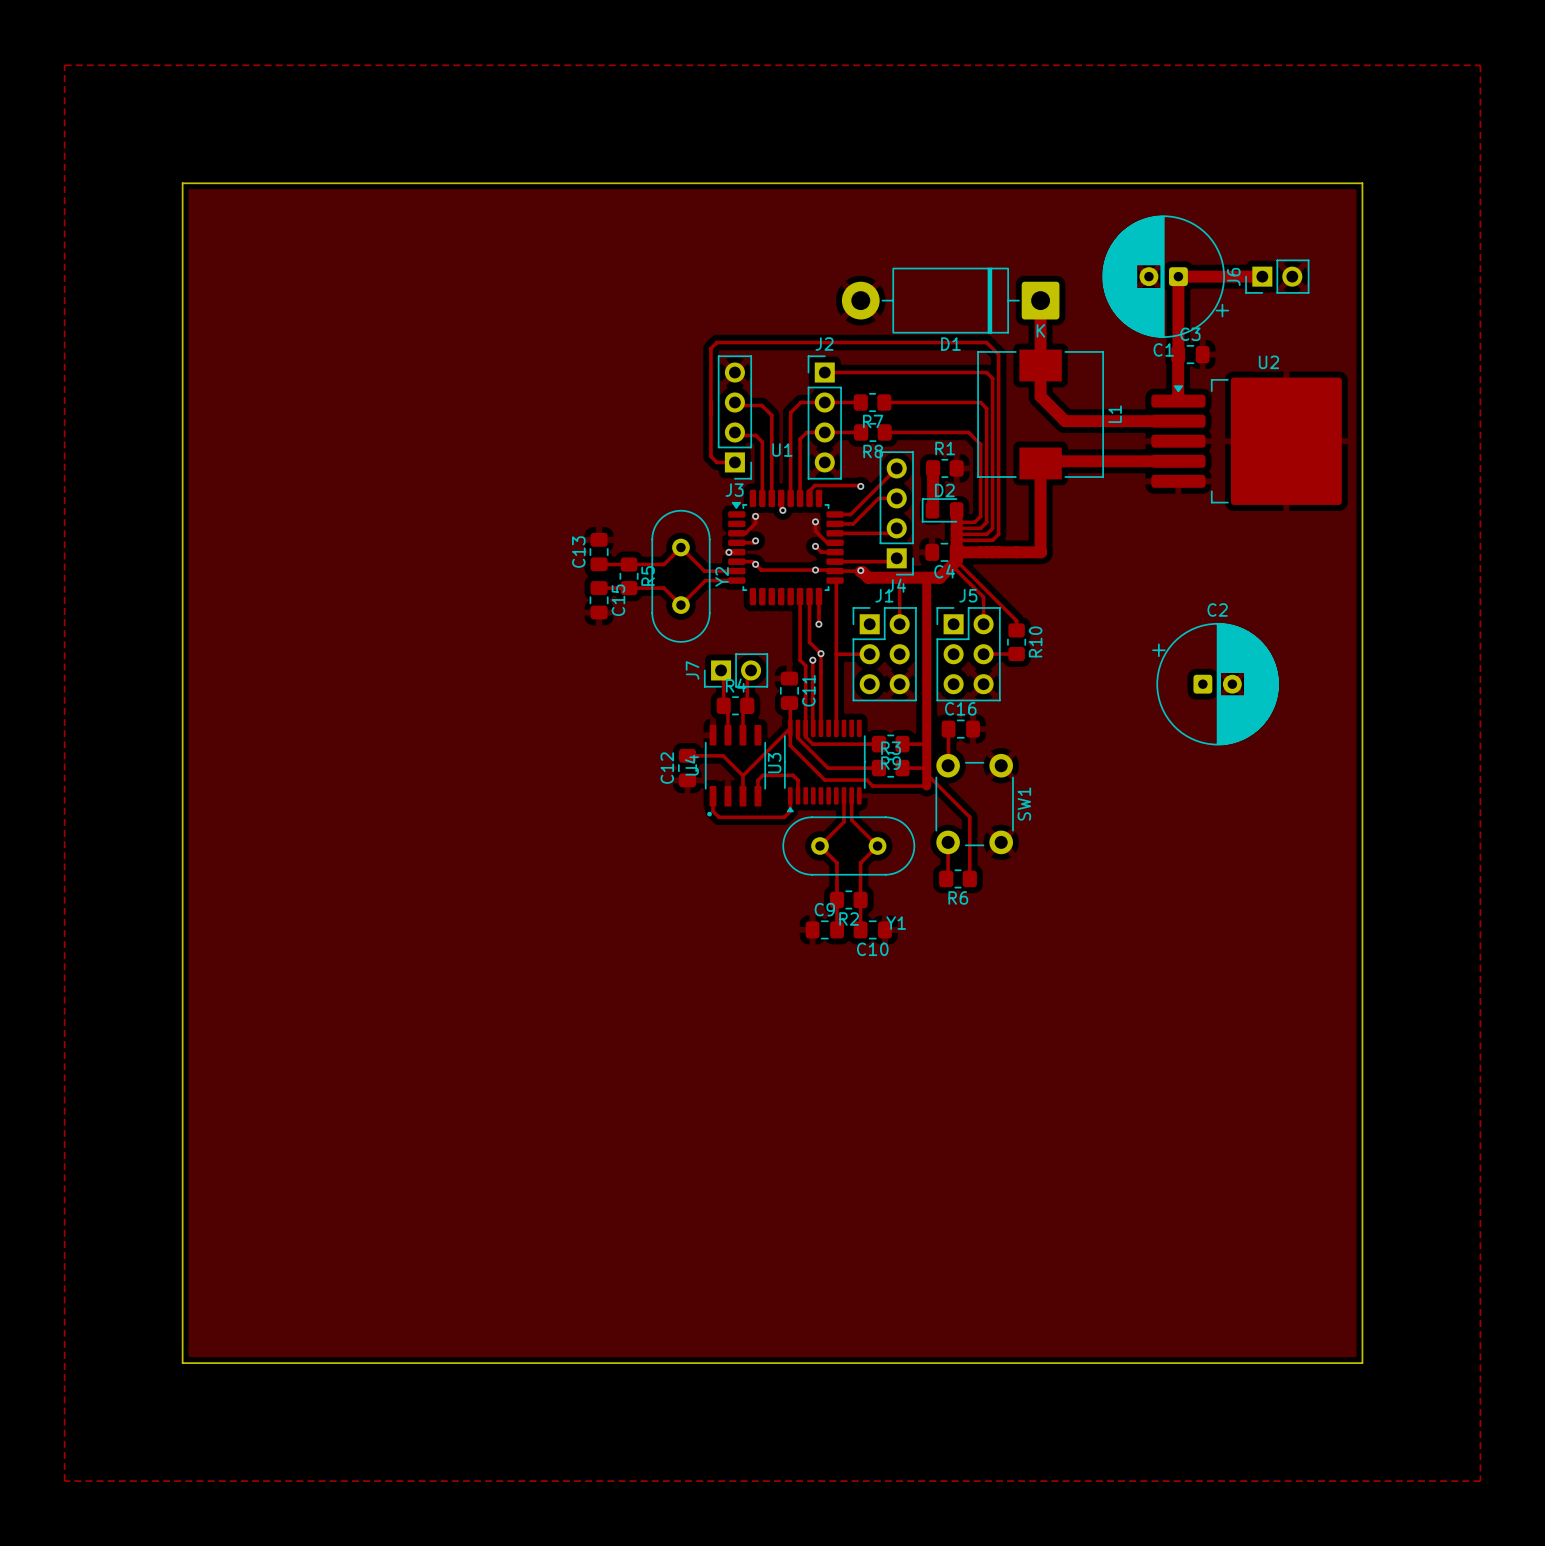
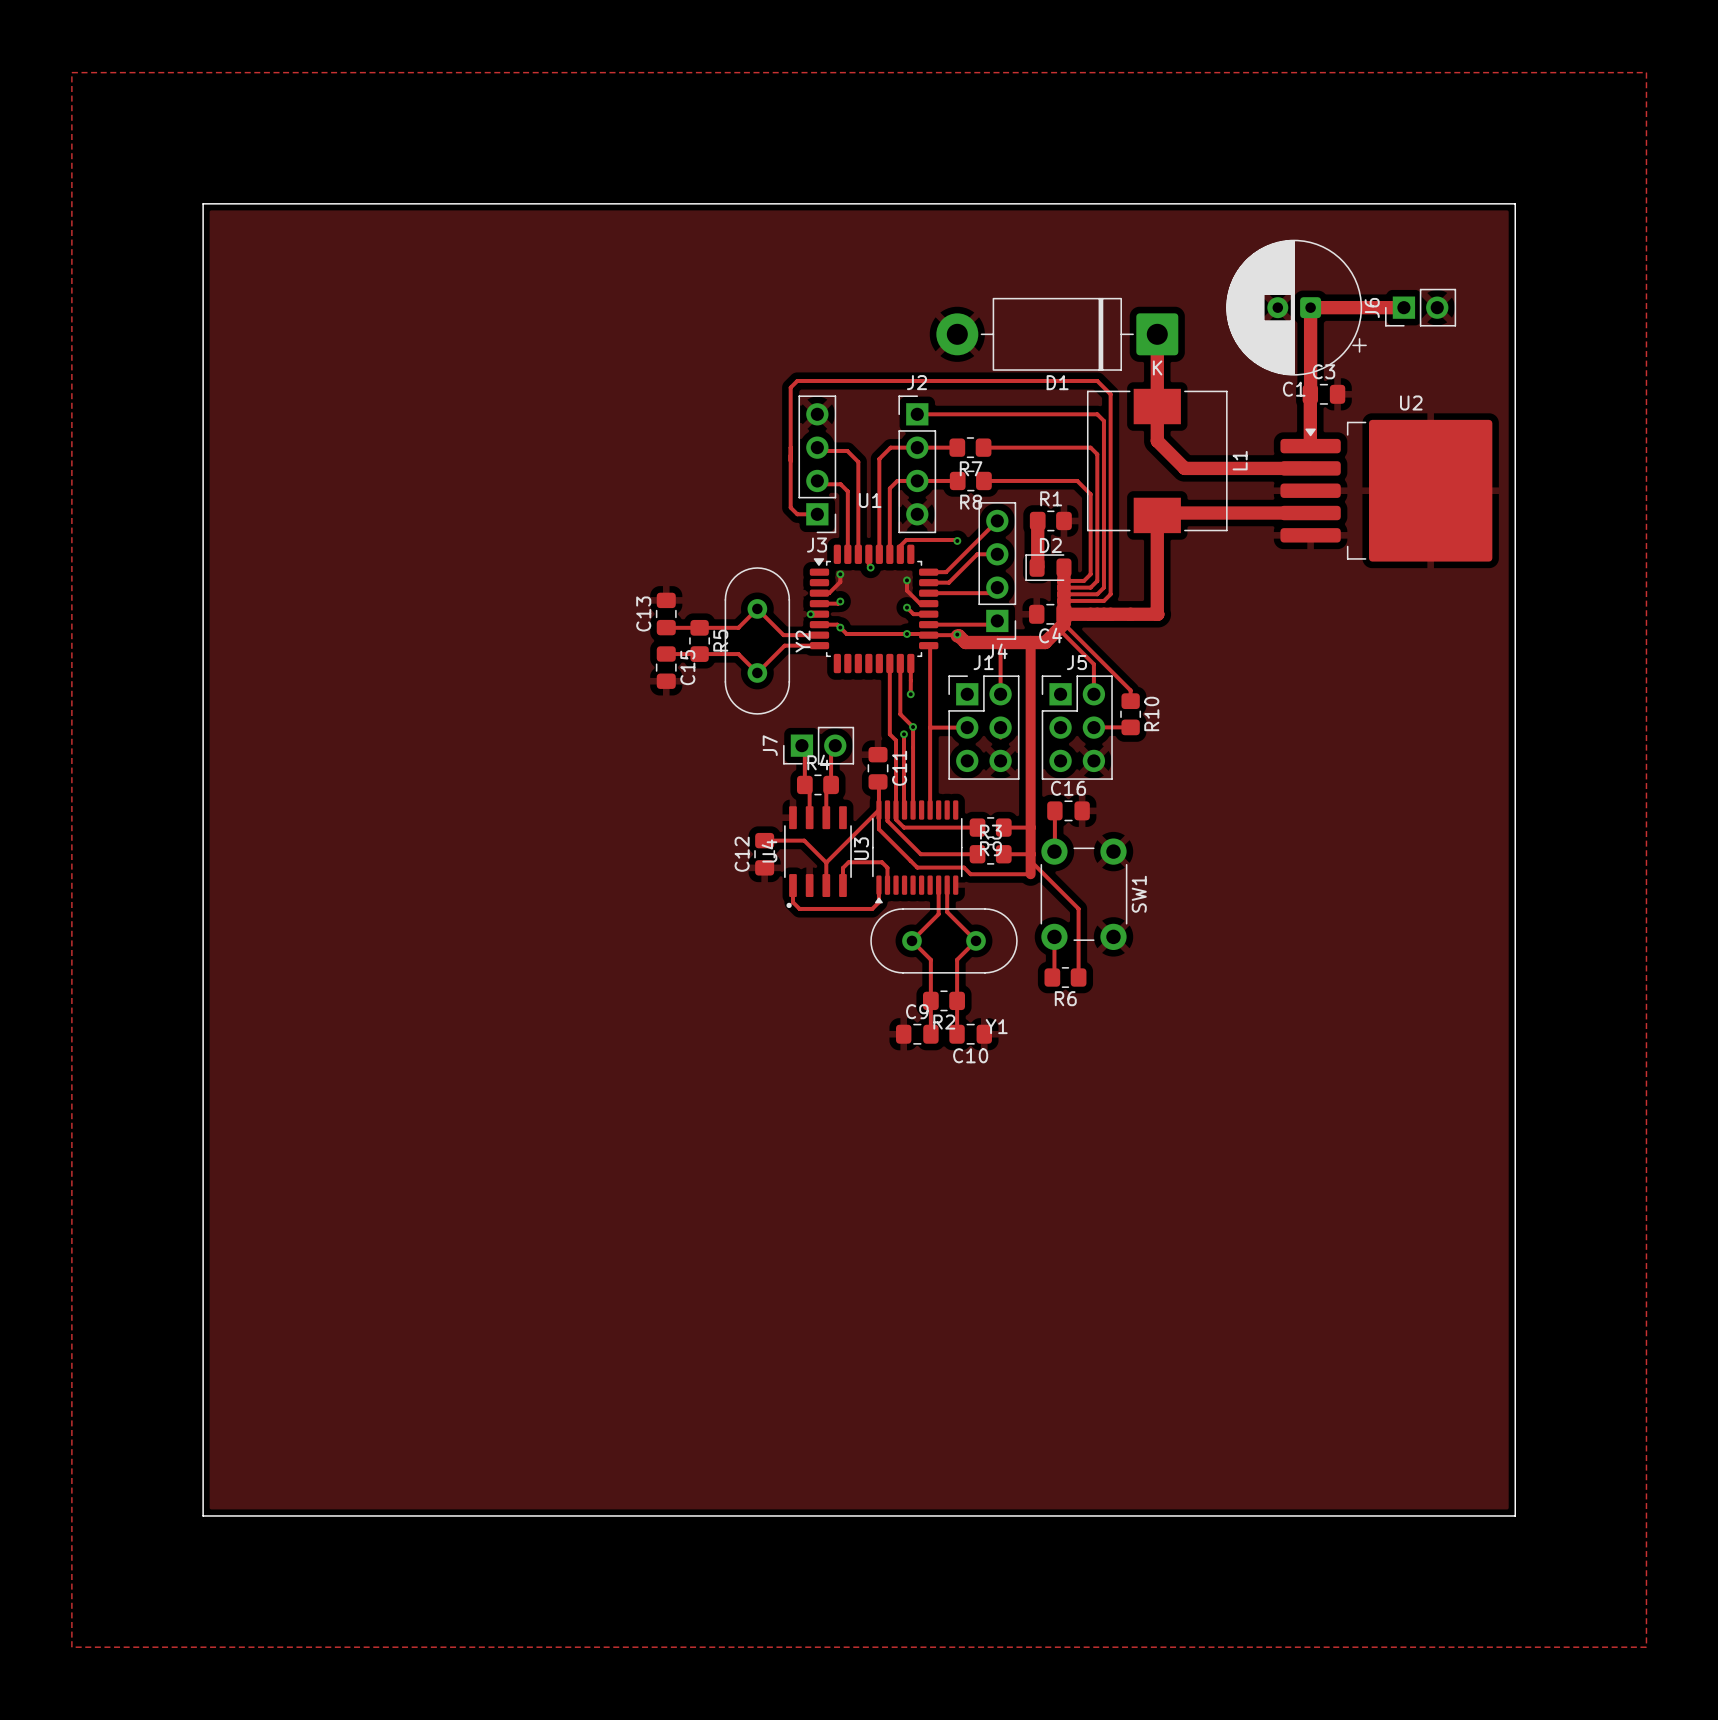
C2: (1215, 684) -> none

